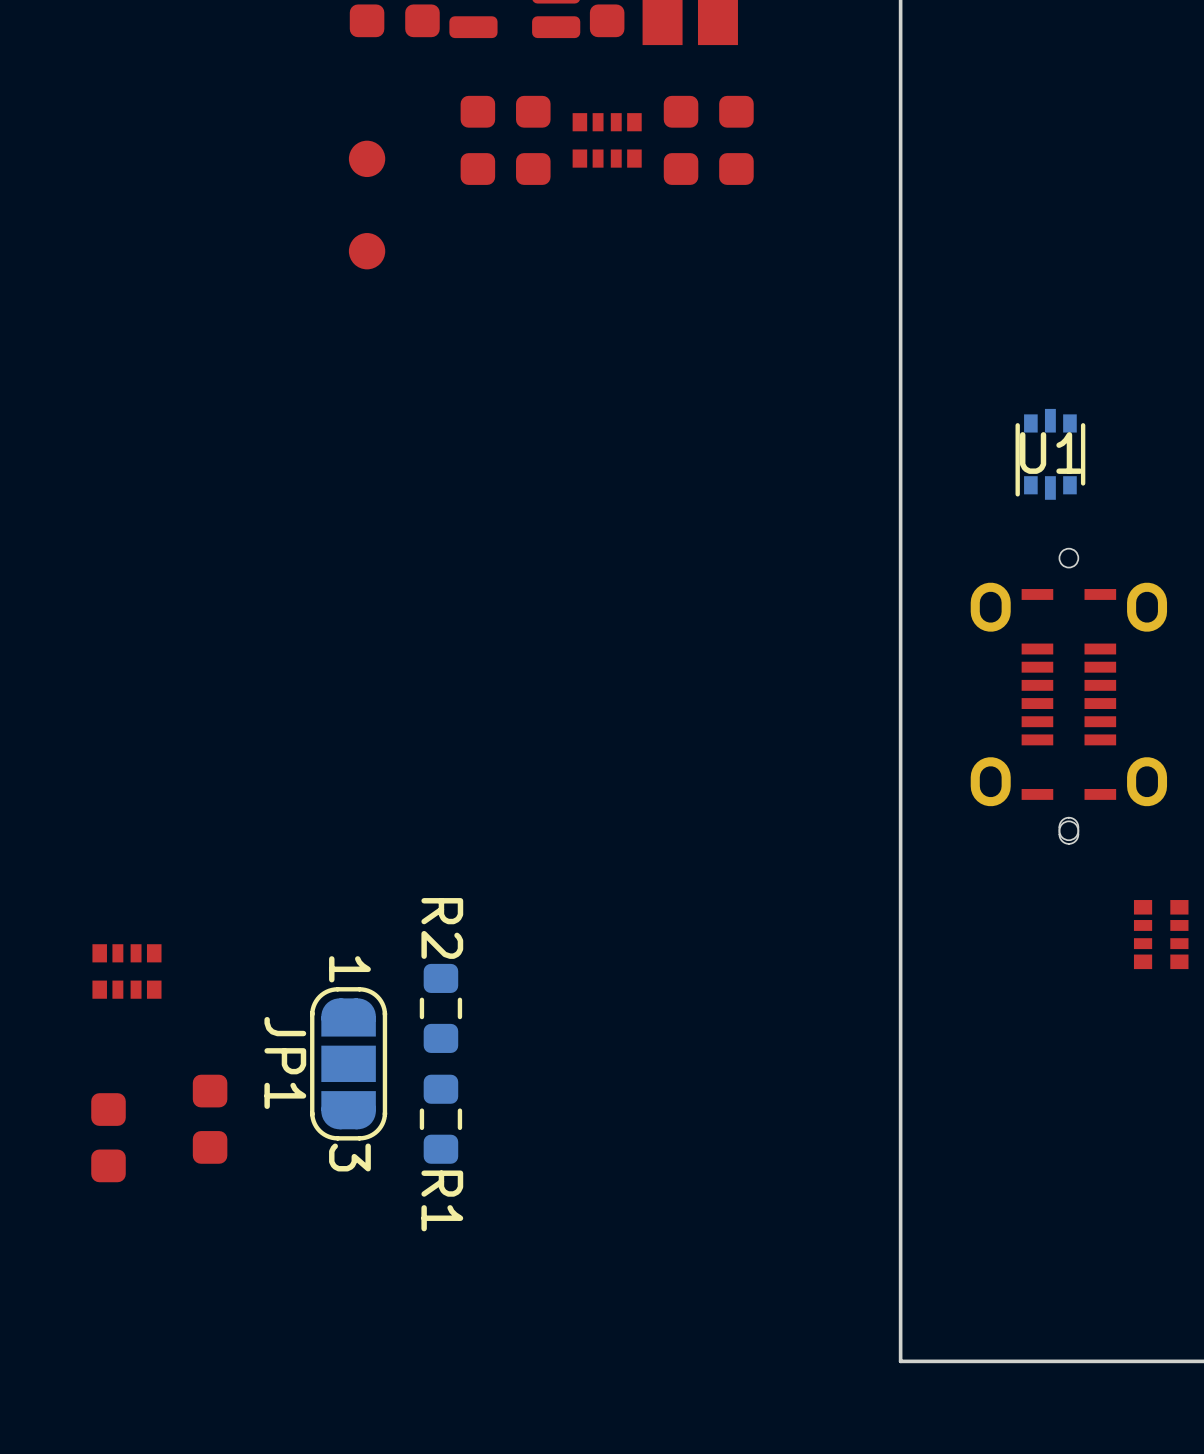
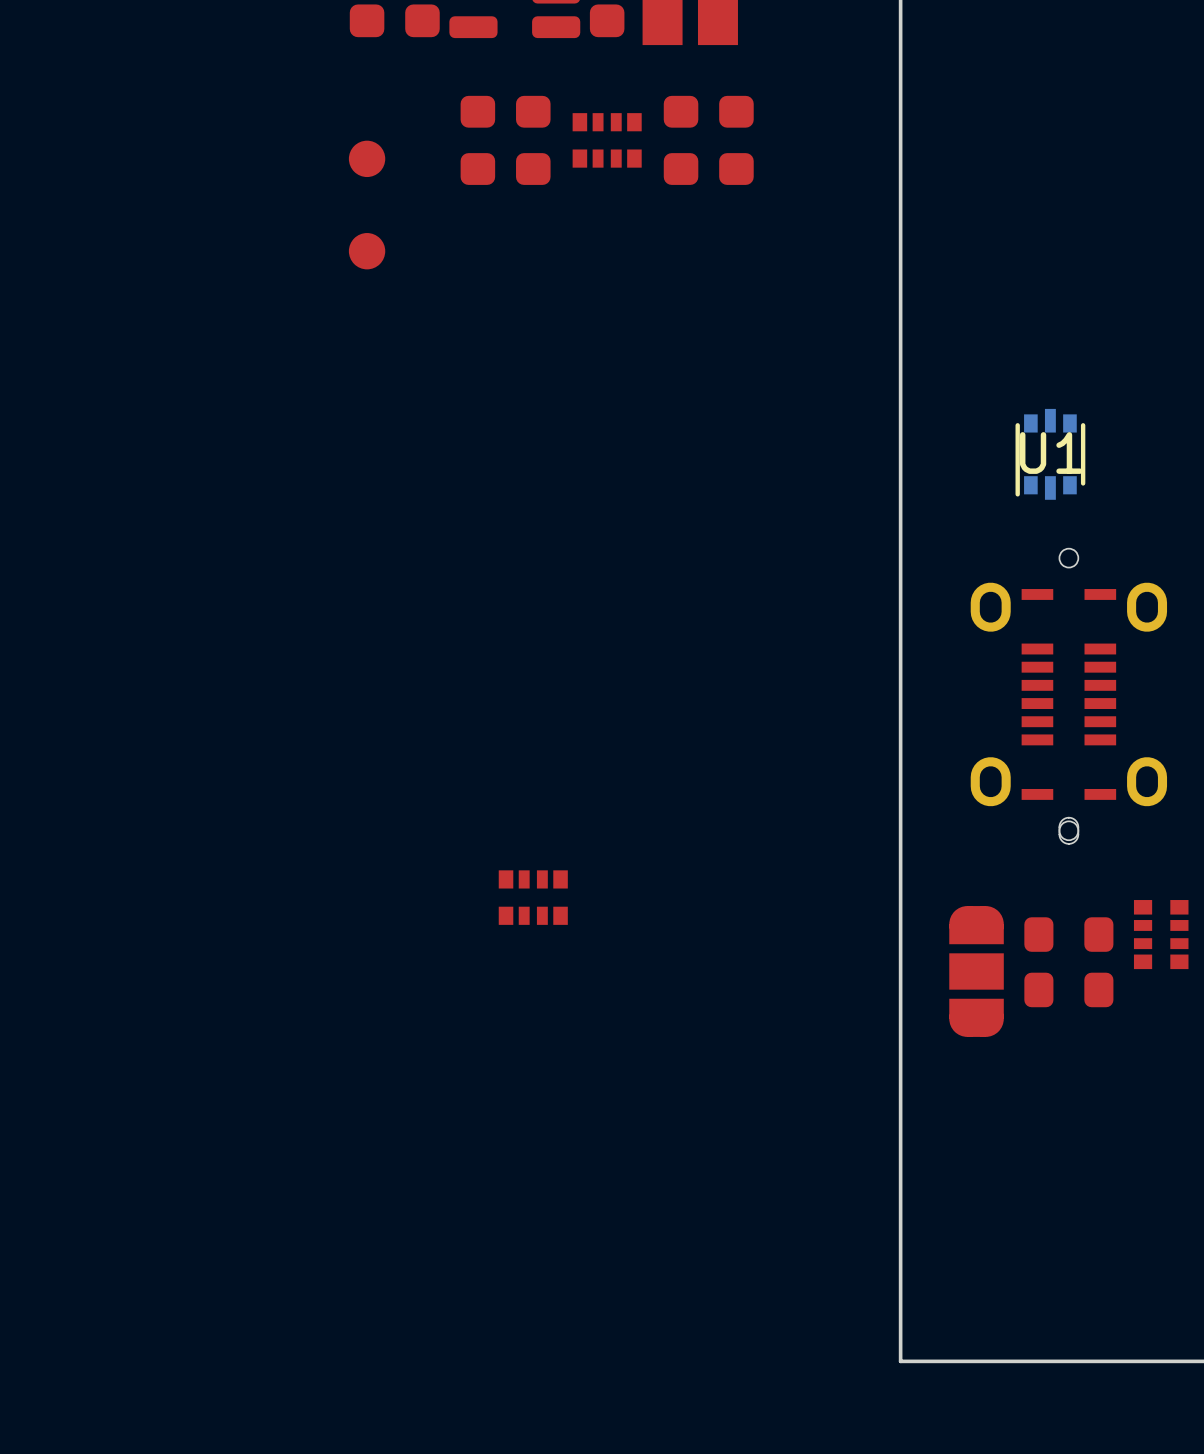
part position: (126, 971) -> (533, 897)
R2 side: bottom (440, 1008) -> top (1068, 989)
JP1 side: bottom (348, 1063) -> top (976, 971)
part: (210, 1119) -> none
R1 side: bottom (440, 1119) -> top (1068, 934)
part: (108, 1137) -> none

